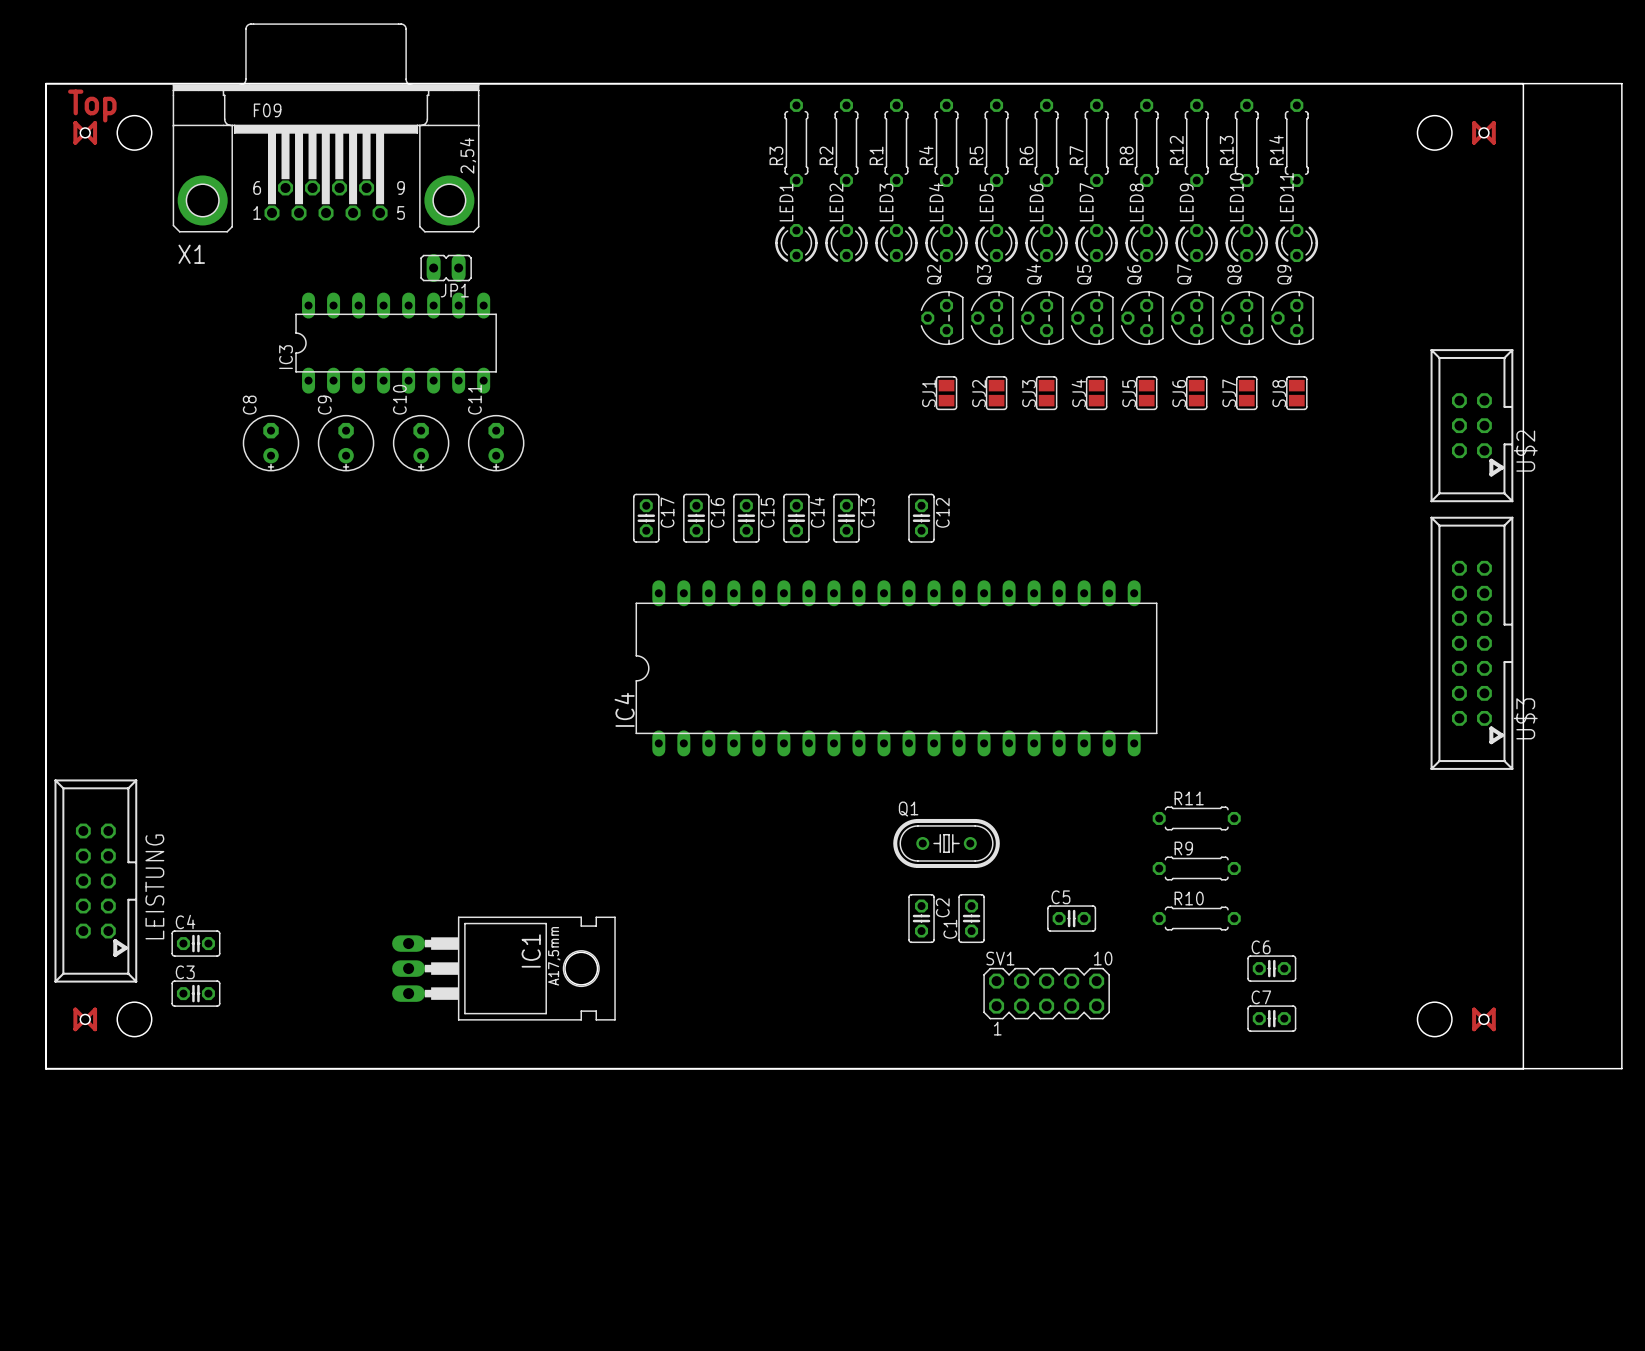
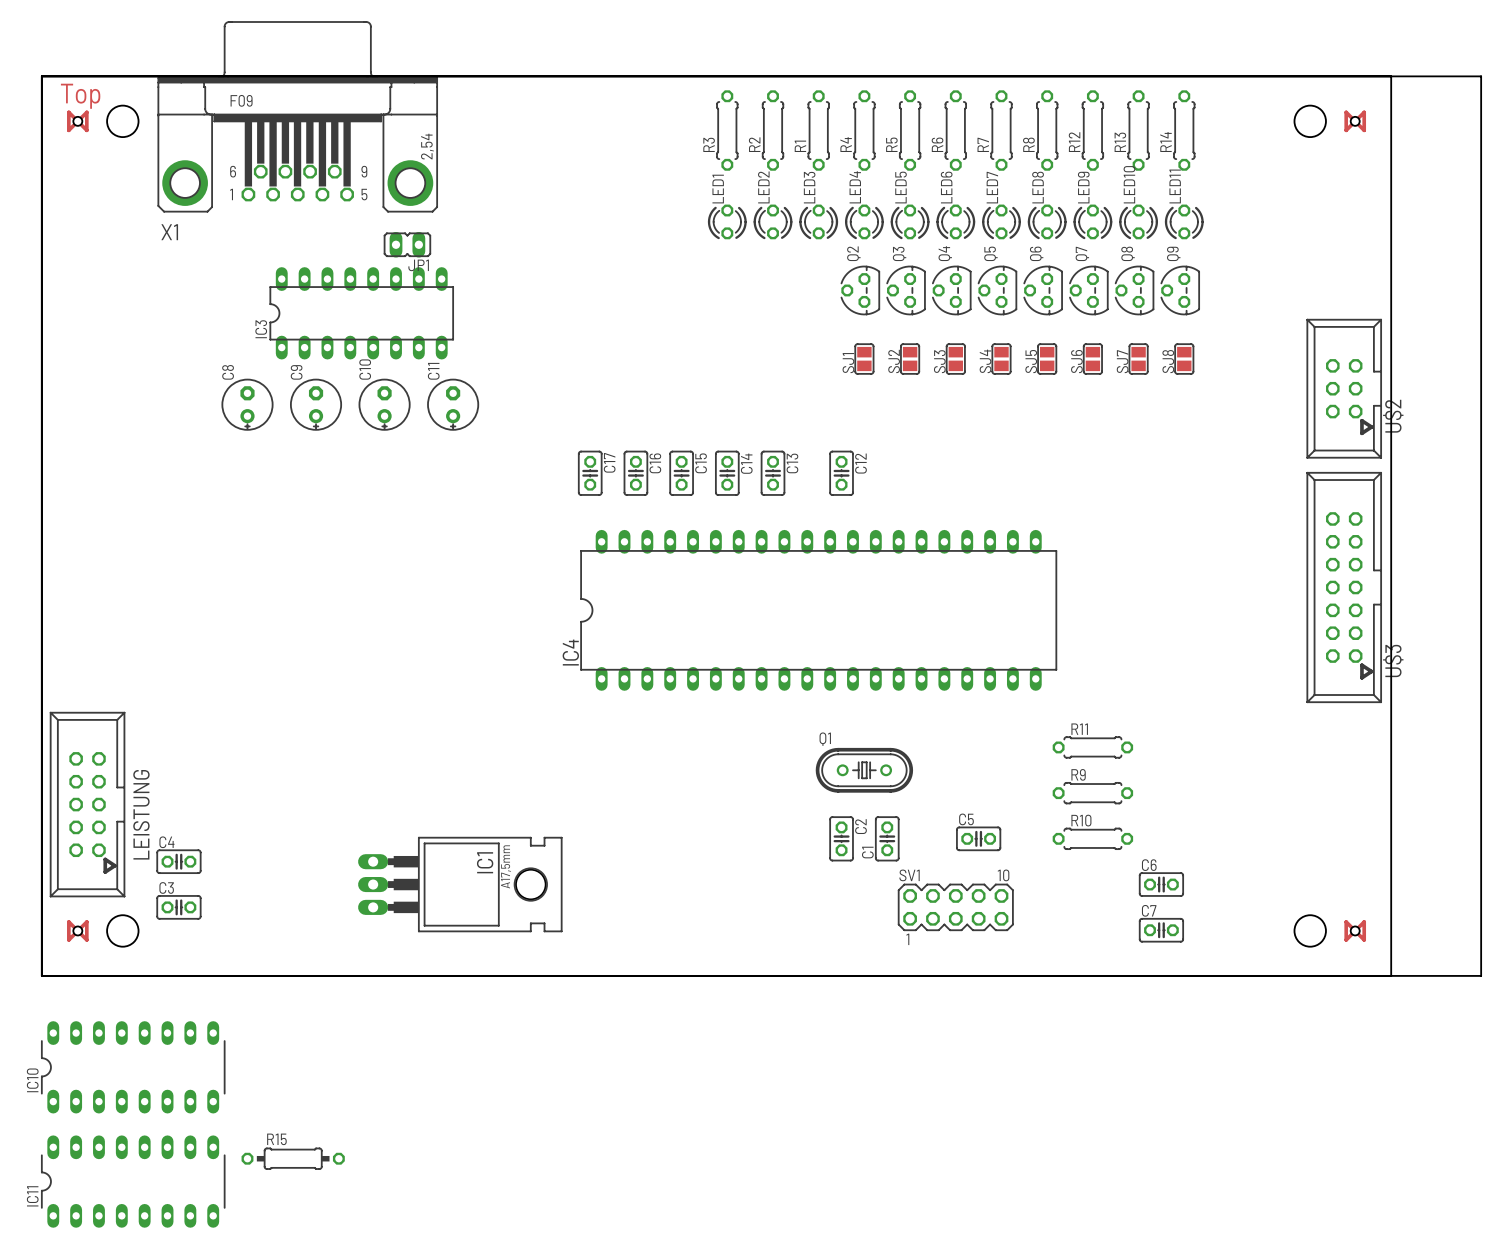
IC10: none -> (133, 1067)
R15: none -> (293, 1158)
IC11: none -> (133, 1181)

